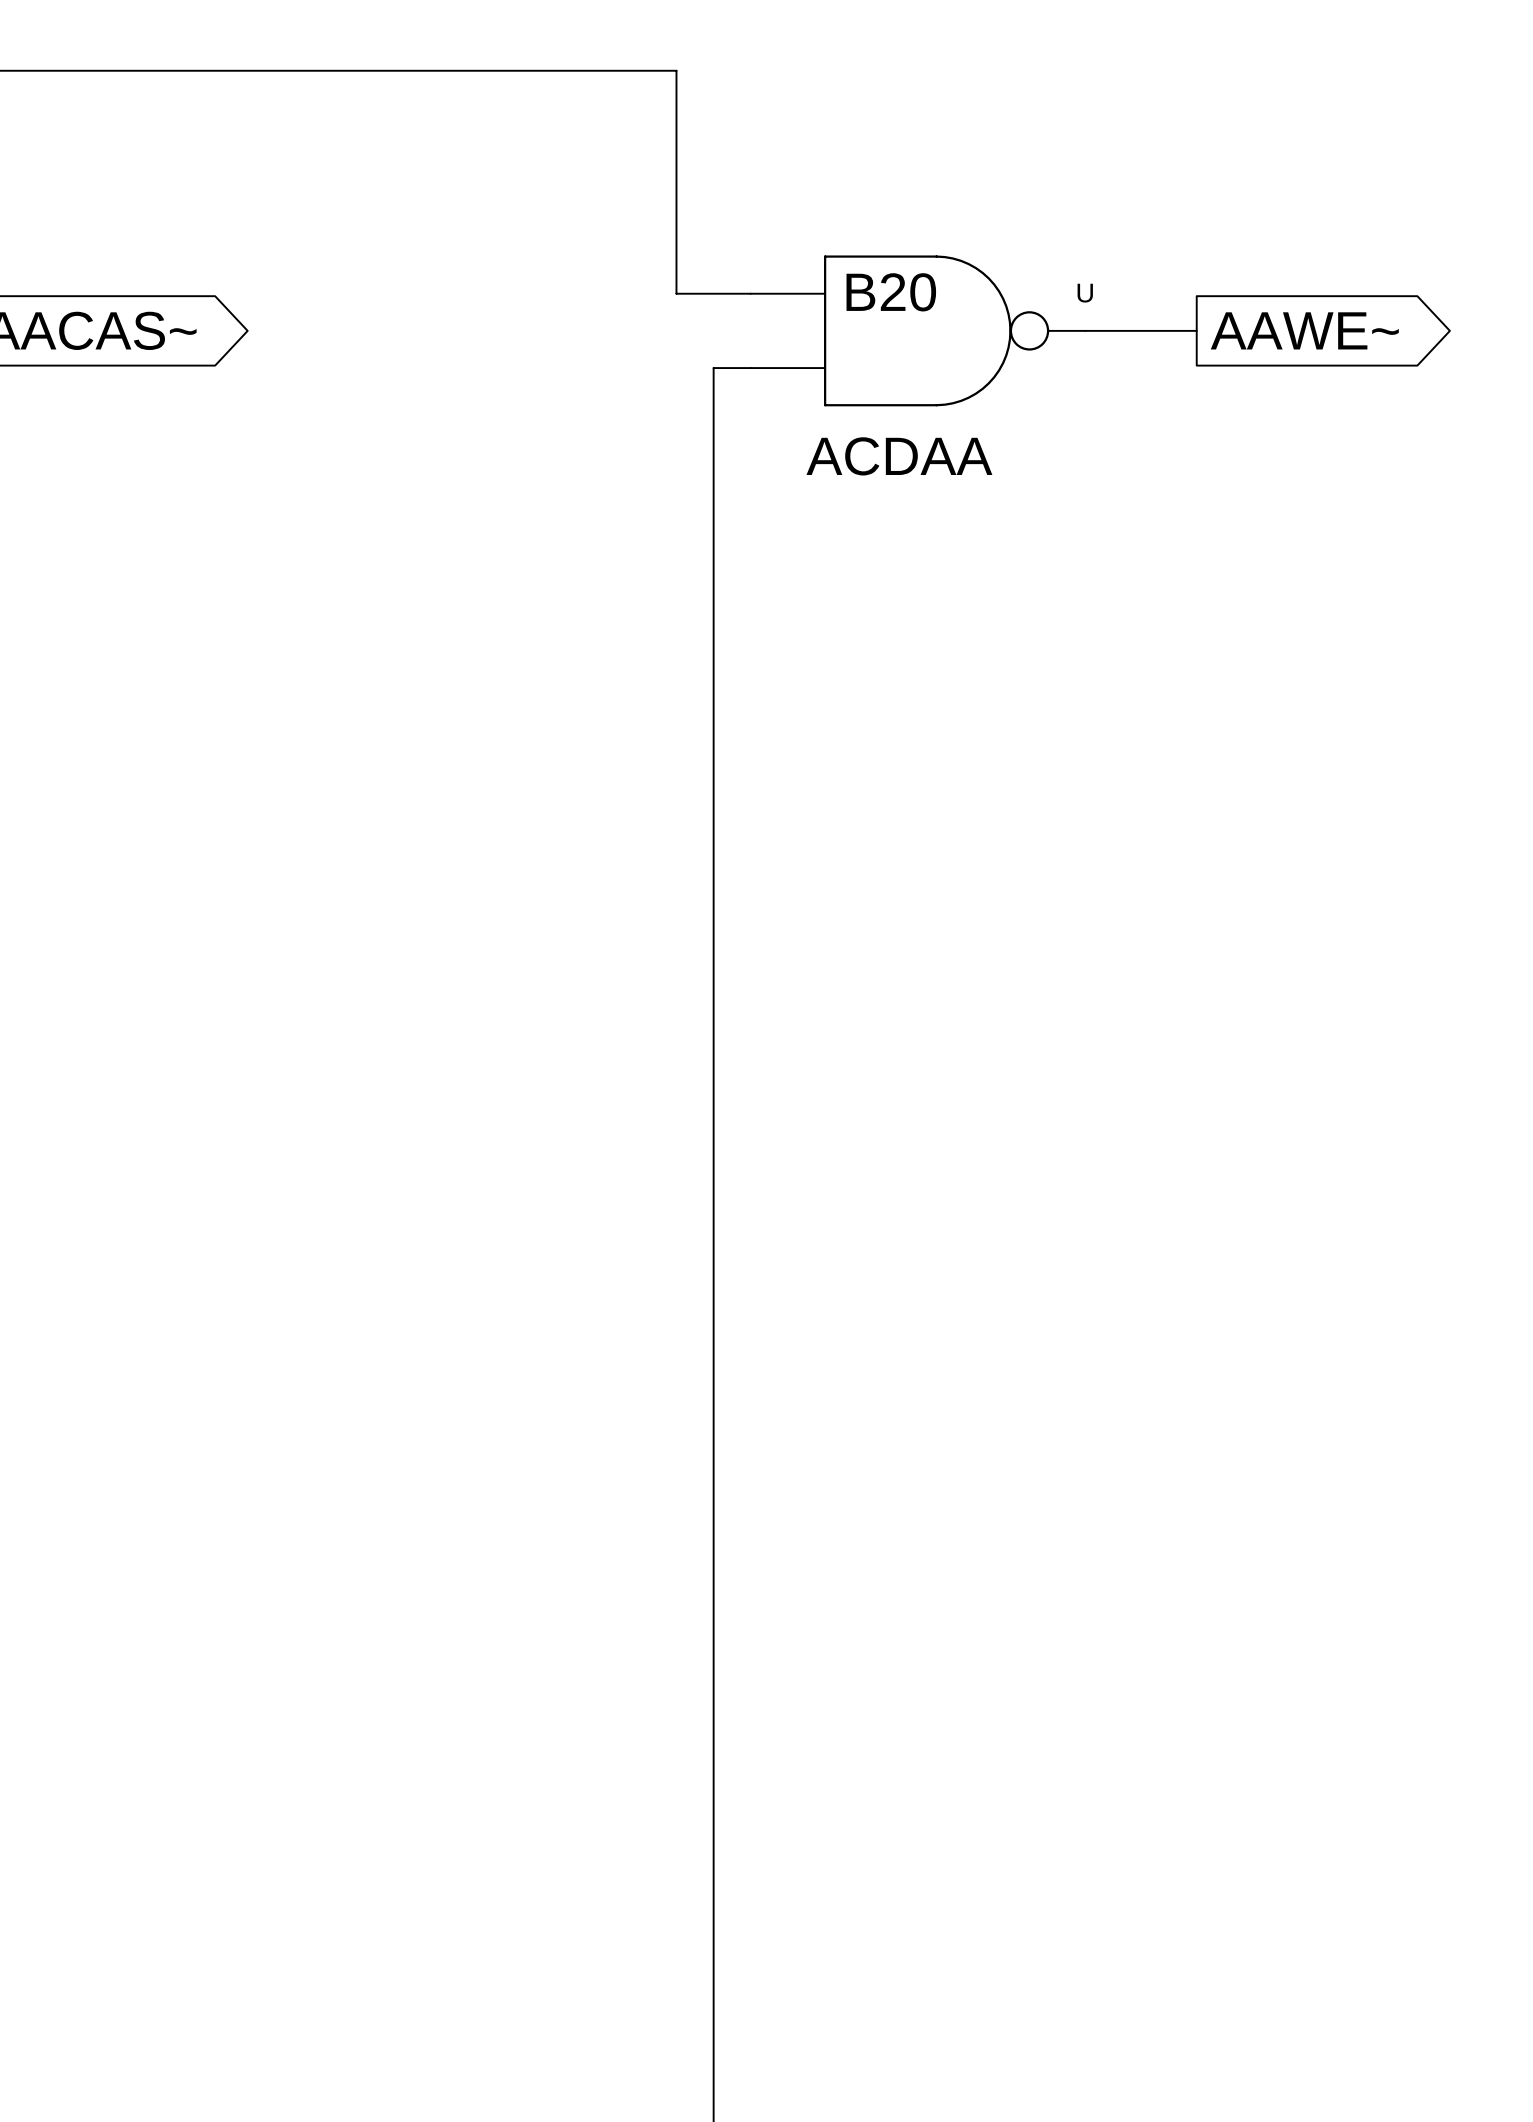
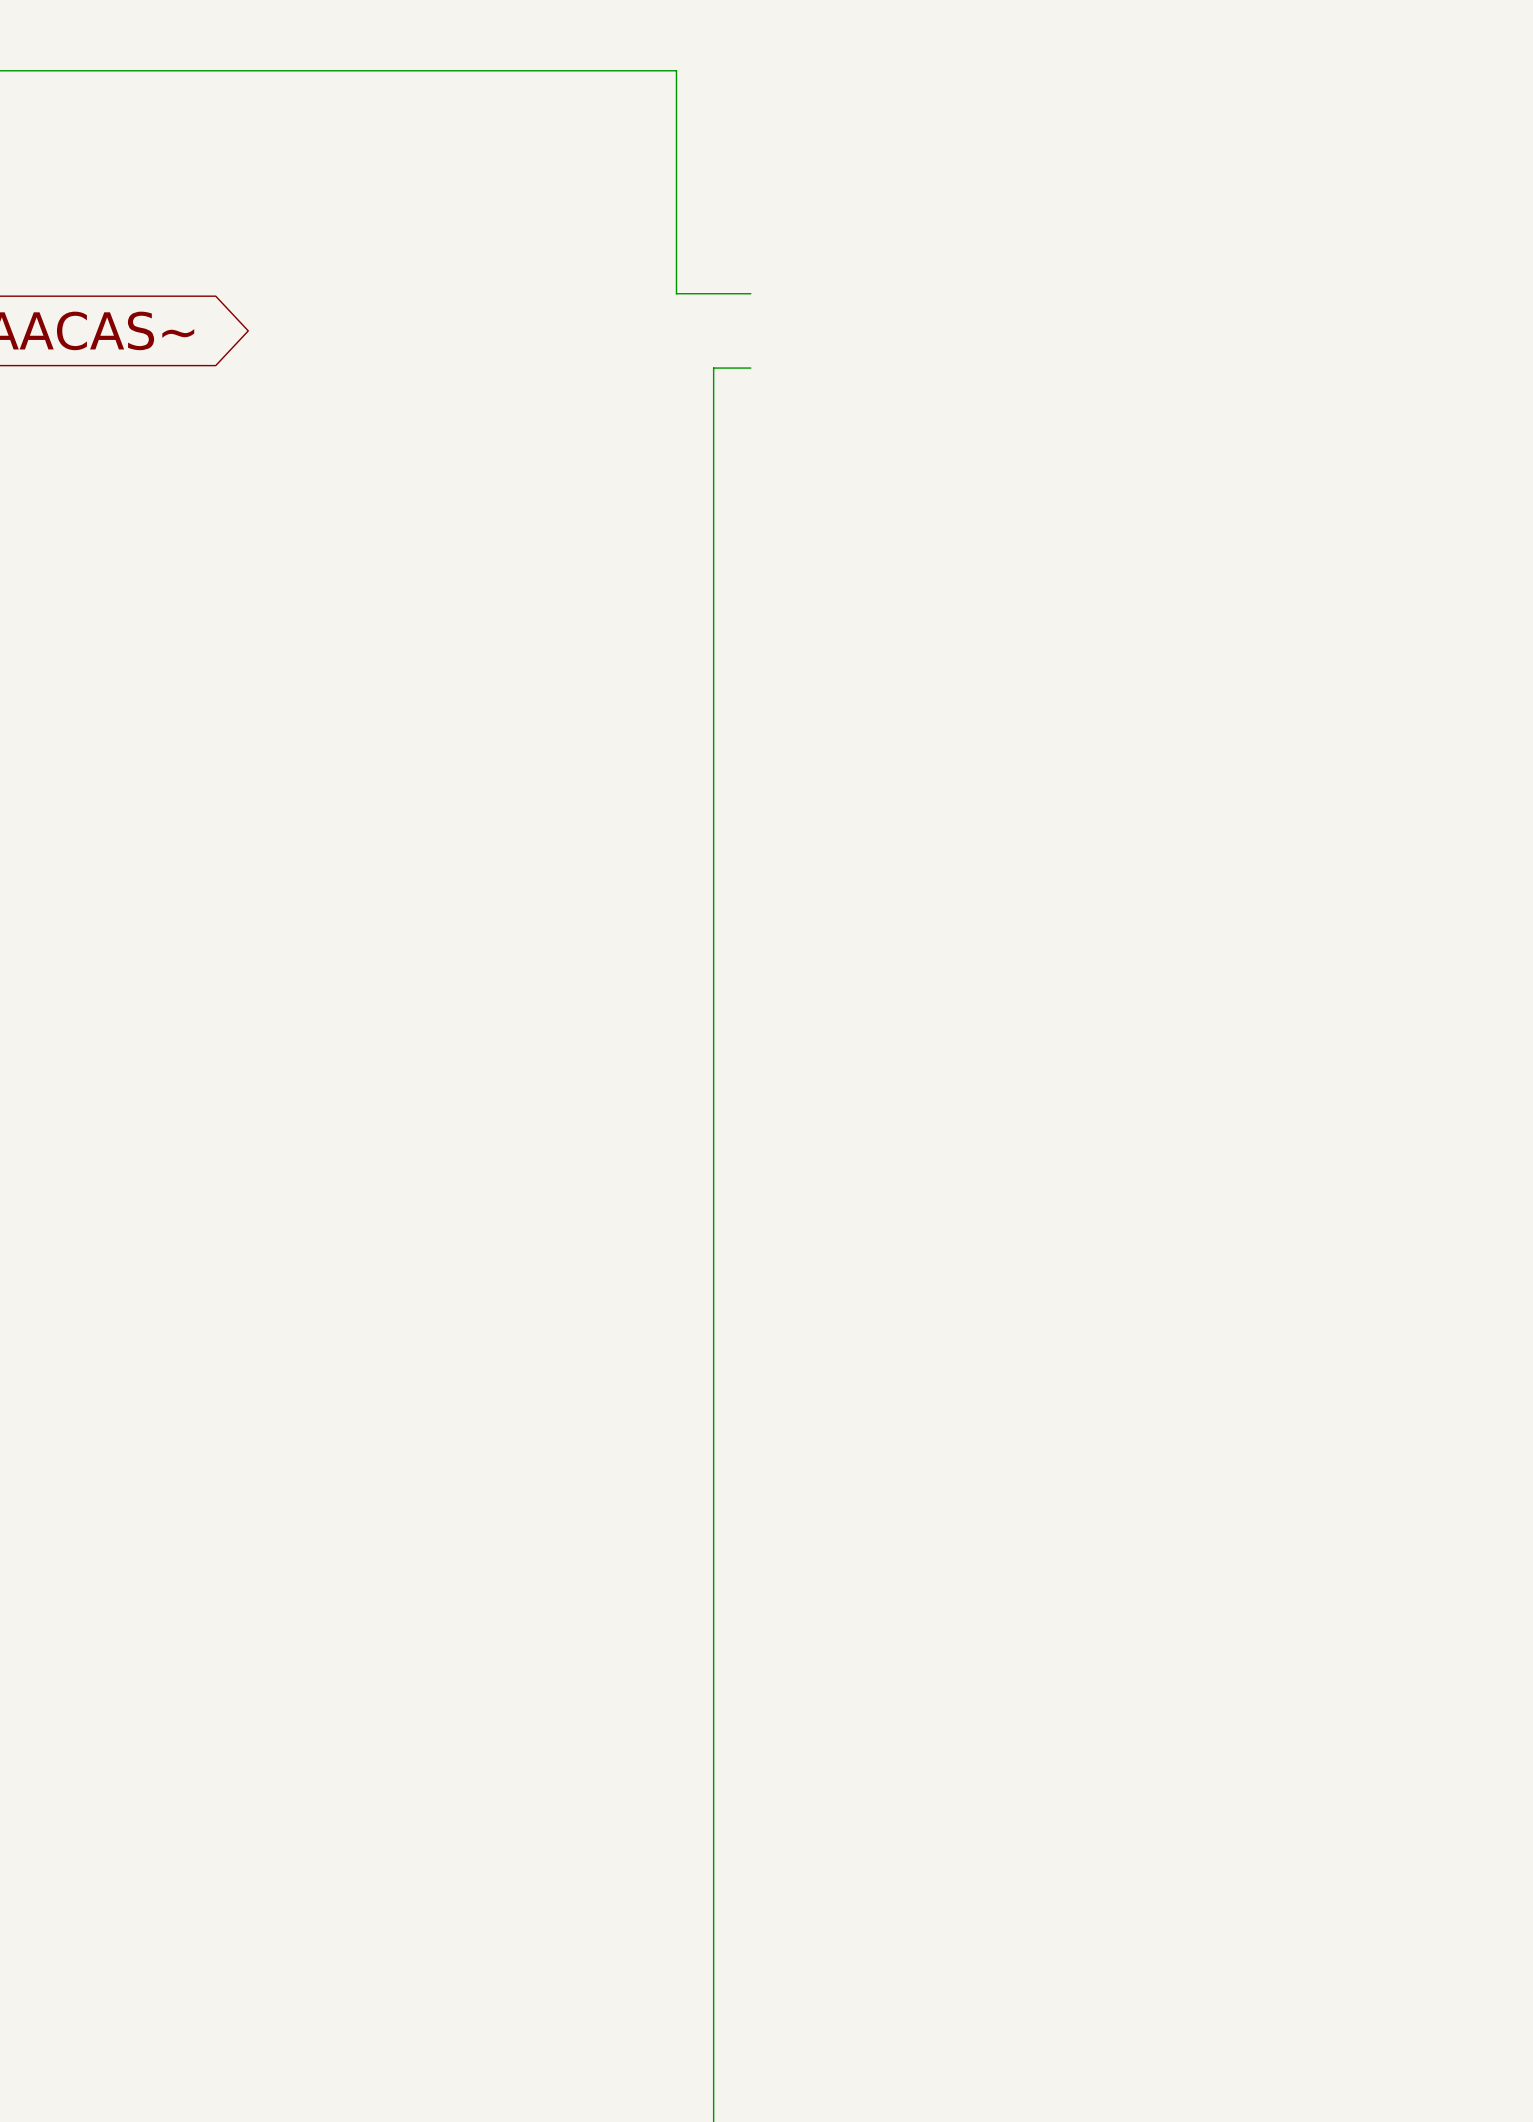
U: (918, 330) -> none
wire: (1085, 330) (1196, 330) -> none
global label: AAWE~ (1304, 330) -> none

